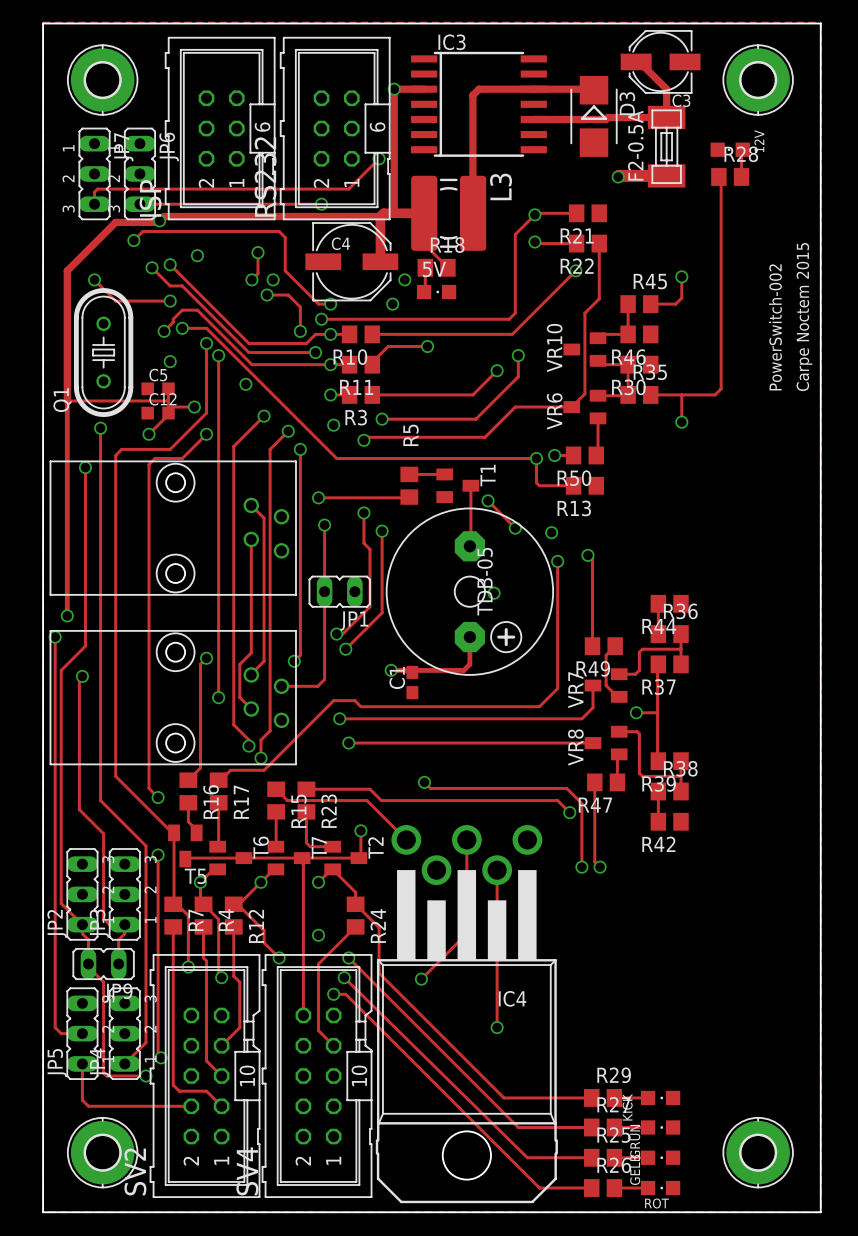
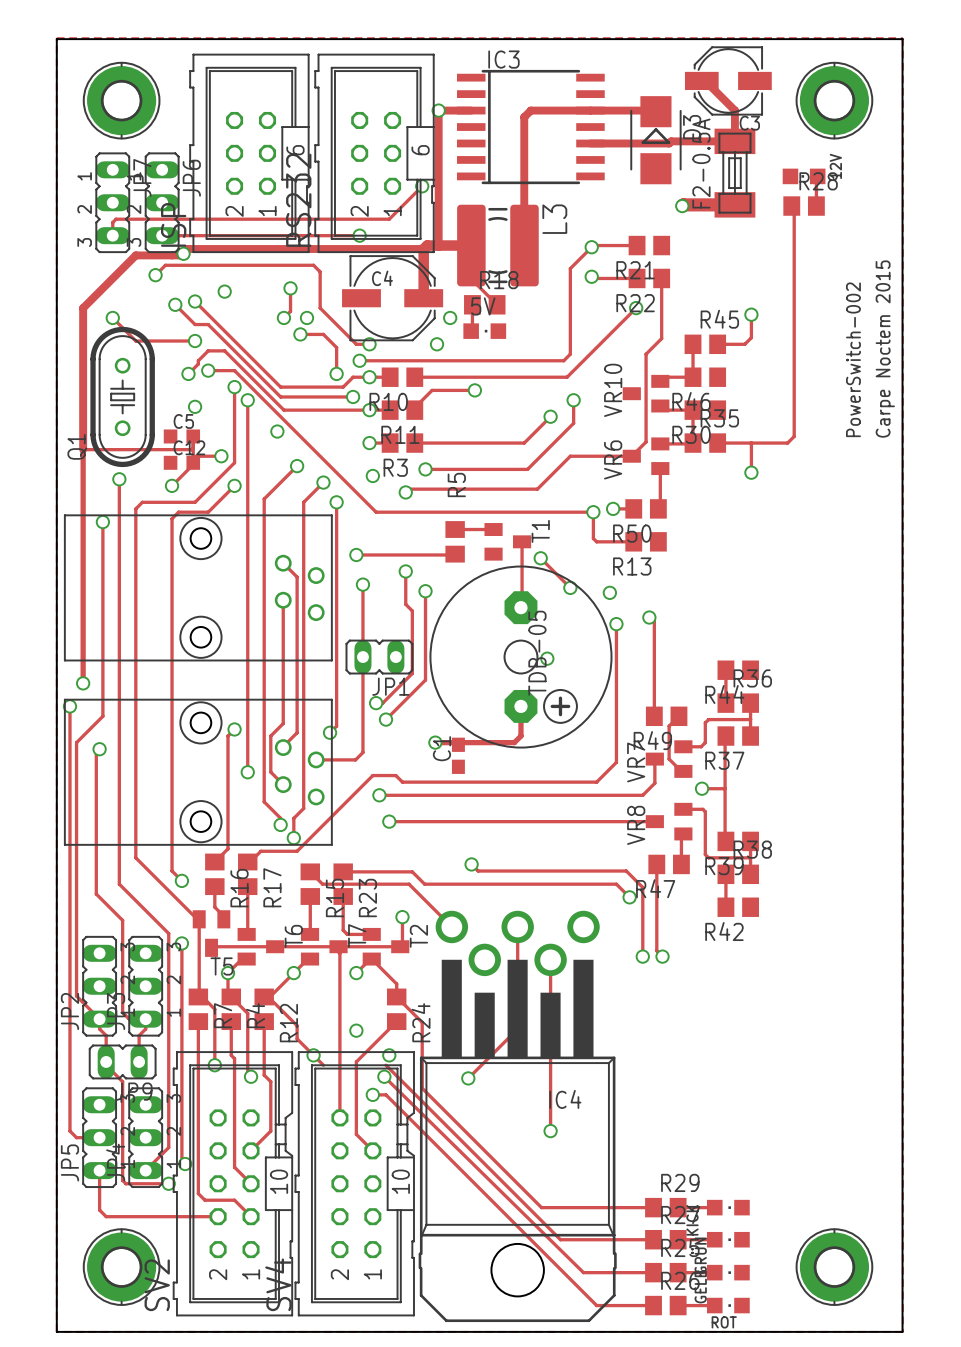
track: none -> (313, 1055) (323, 1065)
track: (348, 957) (379, 988) -> (422, 1071) (422, 1088)
track: none -> (386, 1065) (560, 1239) (573, 1239)
track: (379, 973) (503, 1097) -> none
track: (488, 1097) (518, 1127) -> (541, 1207) (558, 1207)

